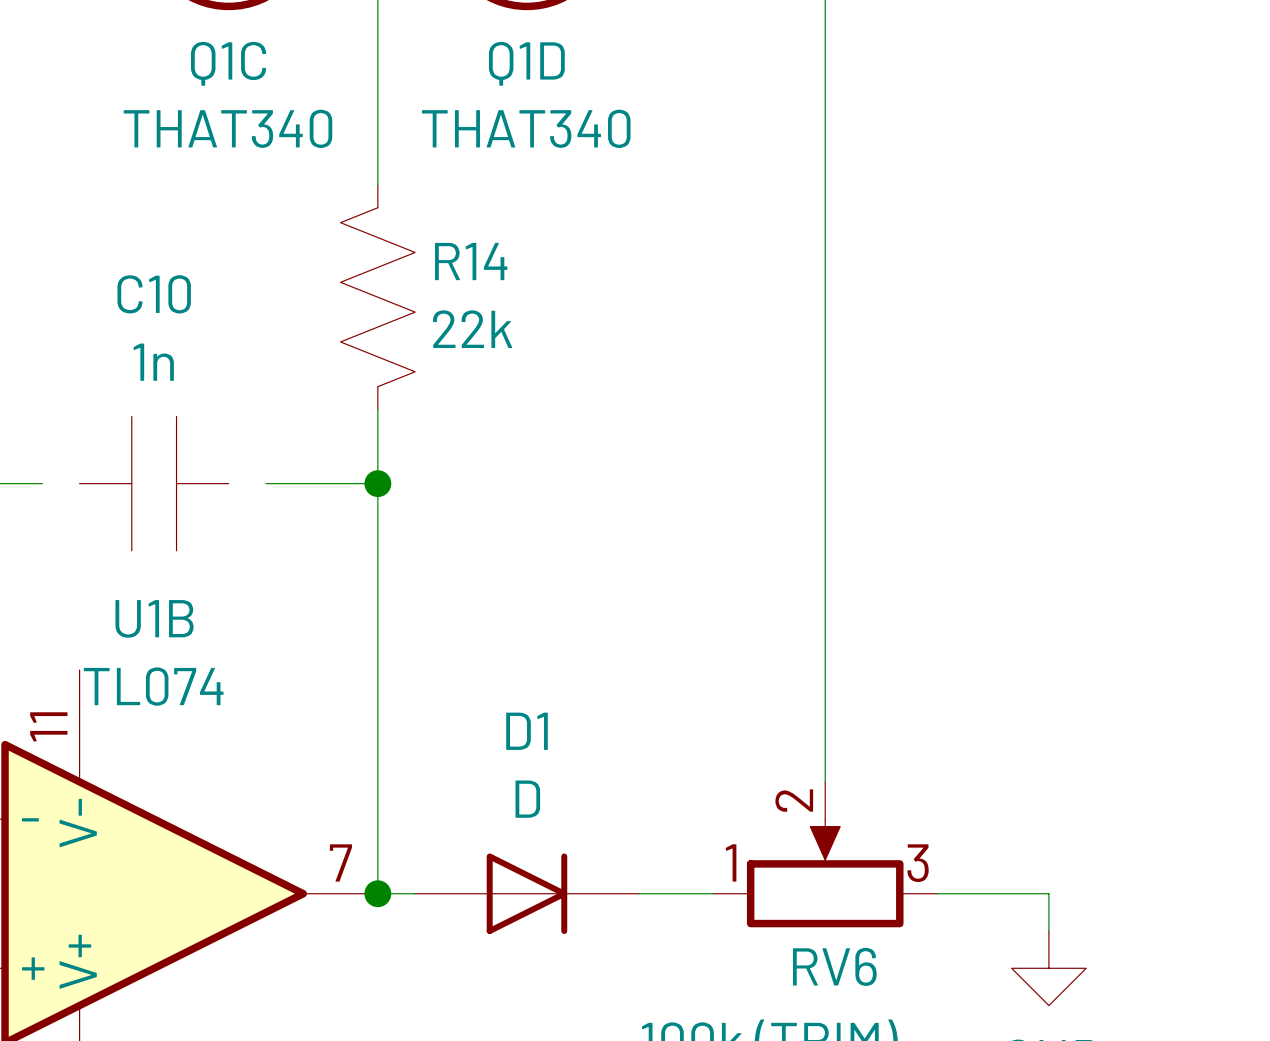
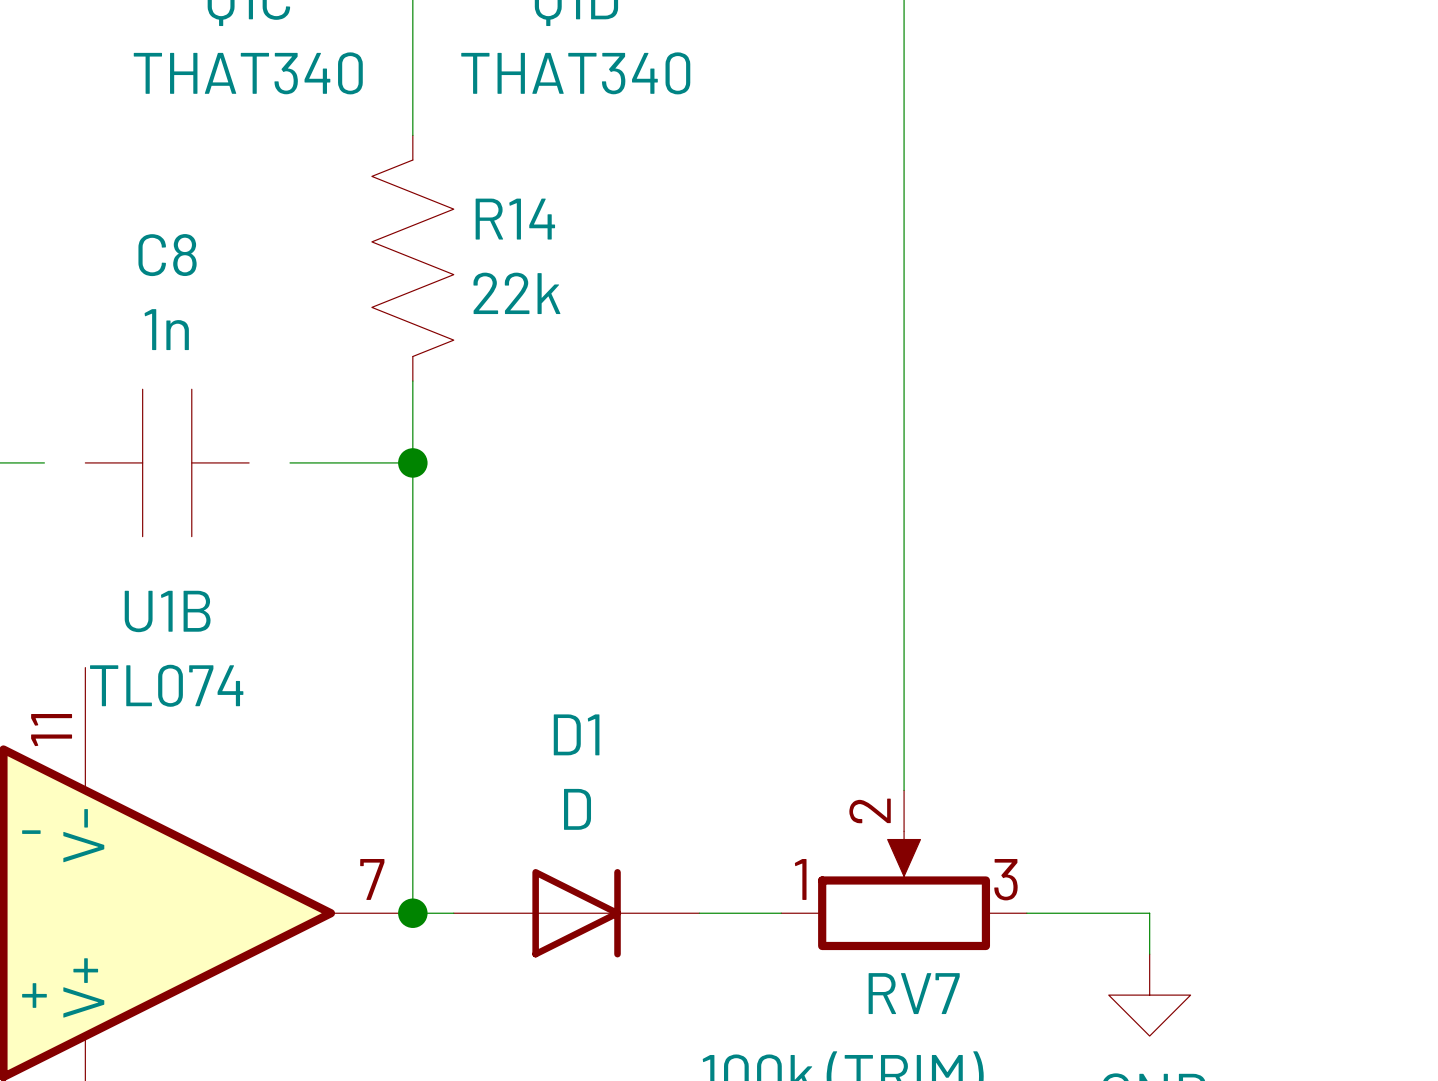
C10 name: C10 (154, 294) -> C8 (167, 255)
RV6 name: RV6 (834, 966) -> RV7 (914, 993)

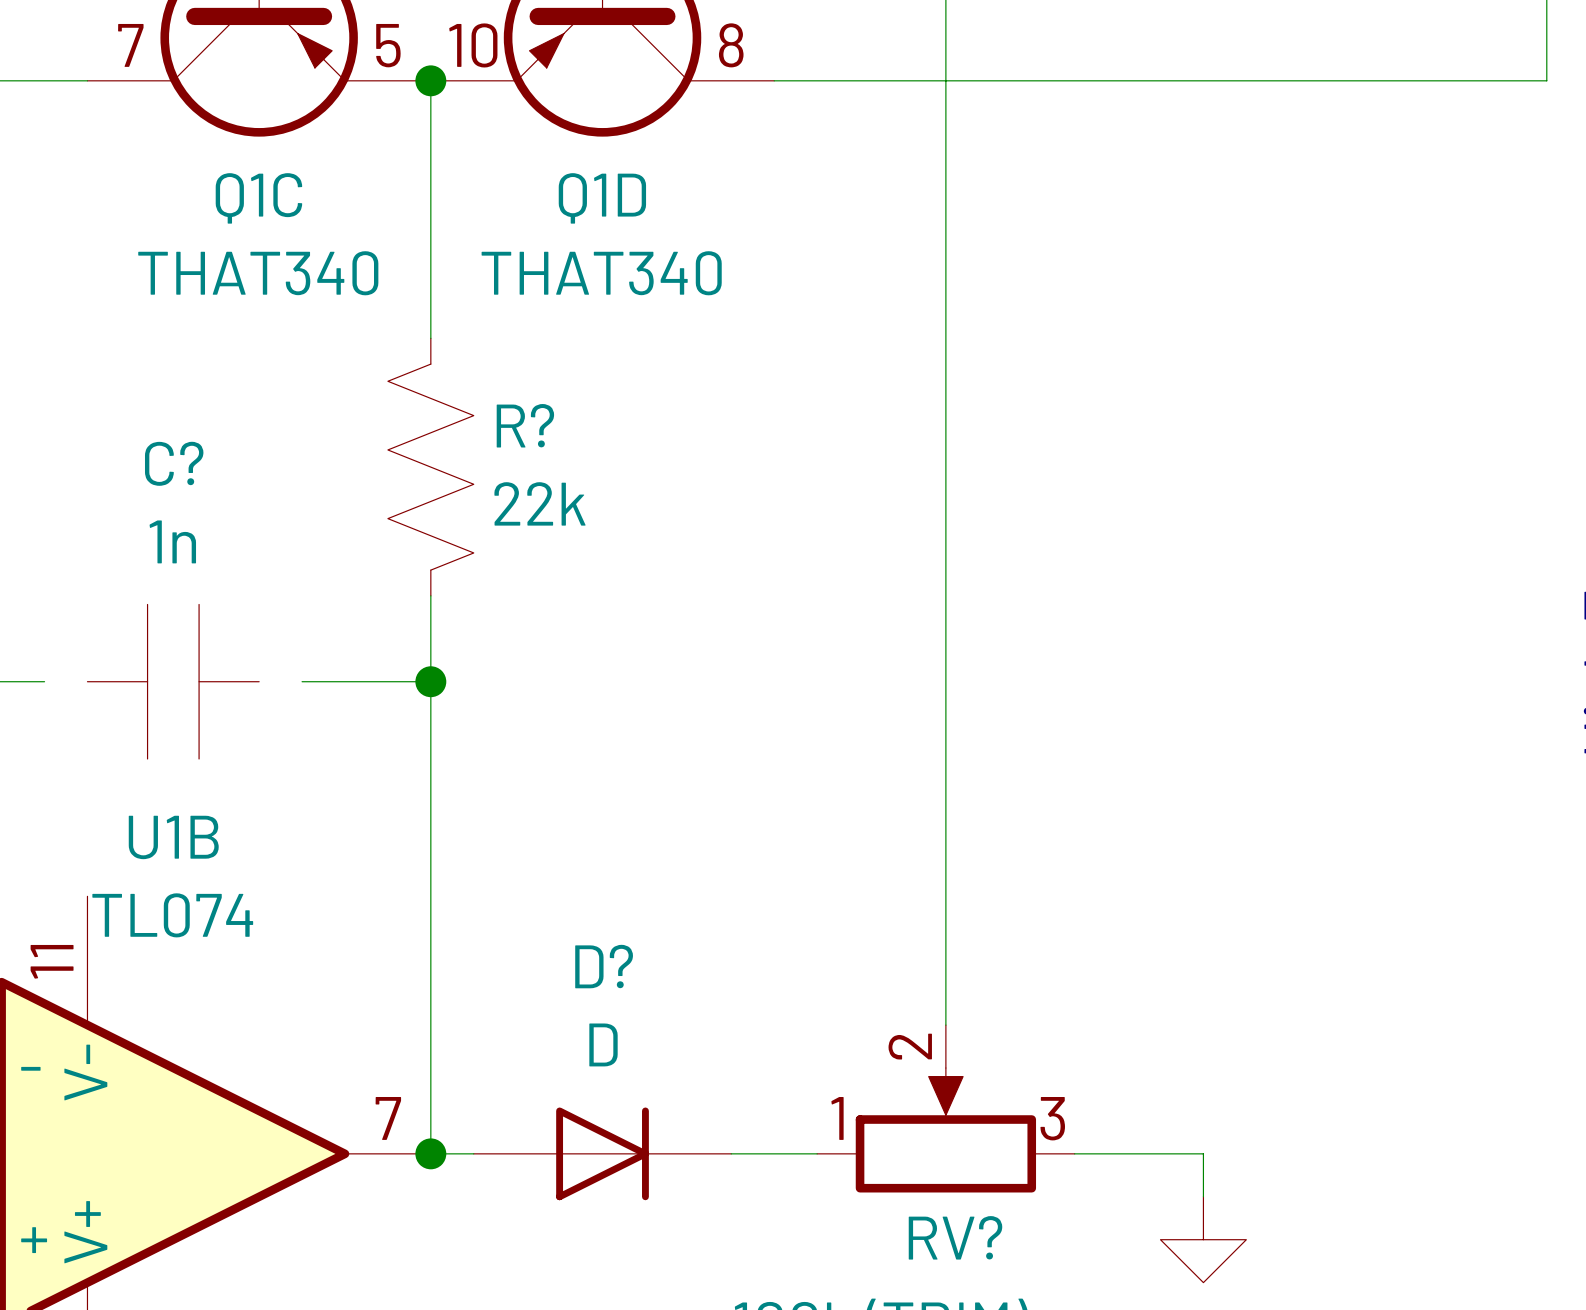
R14 name: R14 (515, 219) -> R? (525, 425)
C8 name: C8 (167, 255) -> C? (174, 463)
D1 name: D1 (576, 734) -> D? (604, 966)
RV7 name: RV7 (914, 993) -> RV? (955, 1237)

